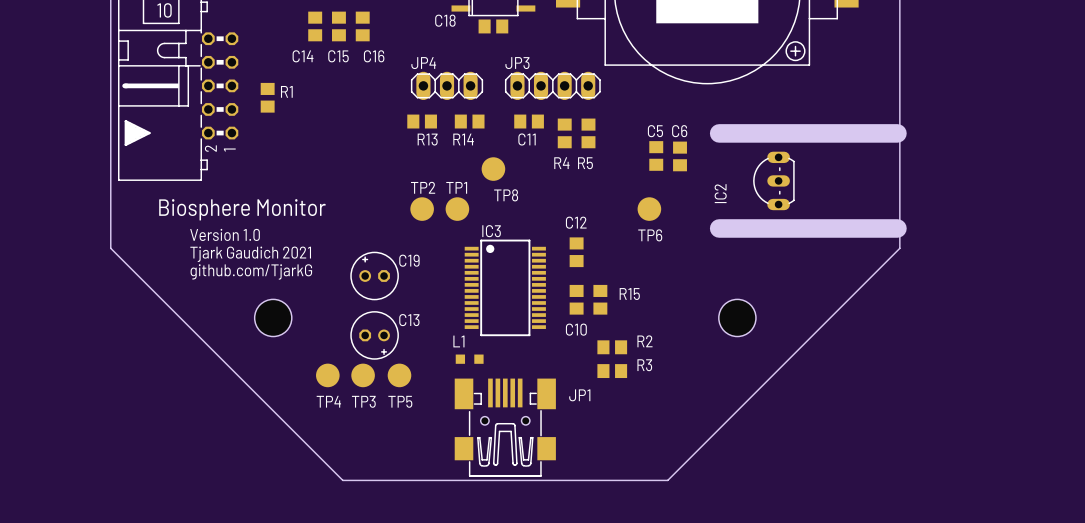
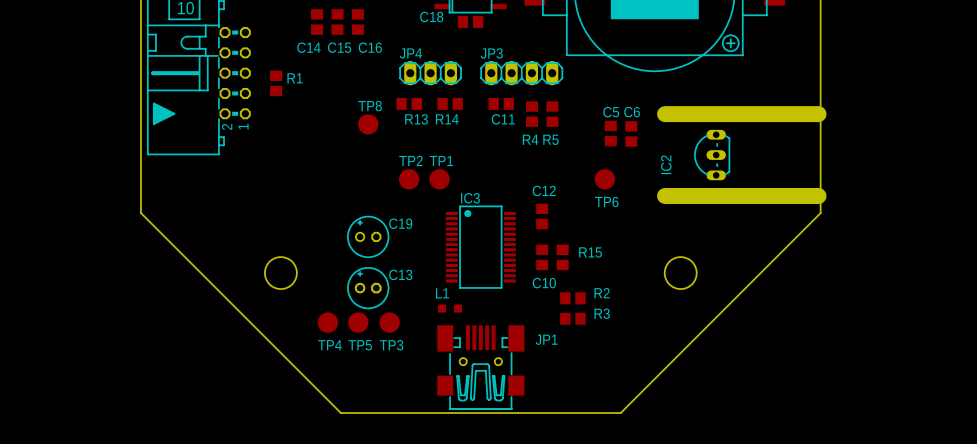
TP8 position: (493, 169) -> (368, 124)
TP8 name position: TP8 (506, 195) -> TP8 (370, 106)
text: Biosphere Monitor (242, 209) -> none
text: Version 1.0 (225, 234) -> none
text: Tjark Gaudich 2021 (250, 254) -> none
text: github.com/TjarkG (251, 271) -> none
C13 footprint: [350, 311, 399, 360] -> [347, 267, 390, 310]
TP3 name: TP3 (363, 401) -> TP5 (360, 345)
TP5 name: TP5 (400, 401) -> TP3 (391, 345)

